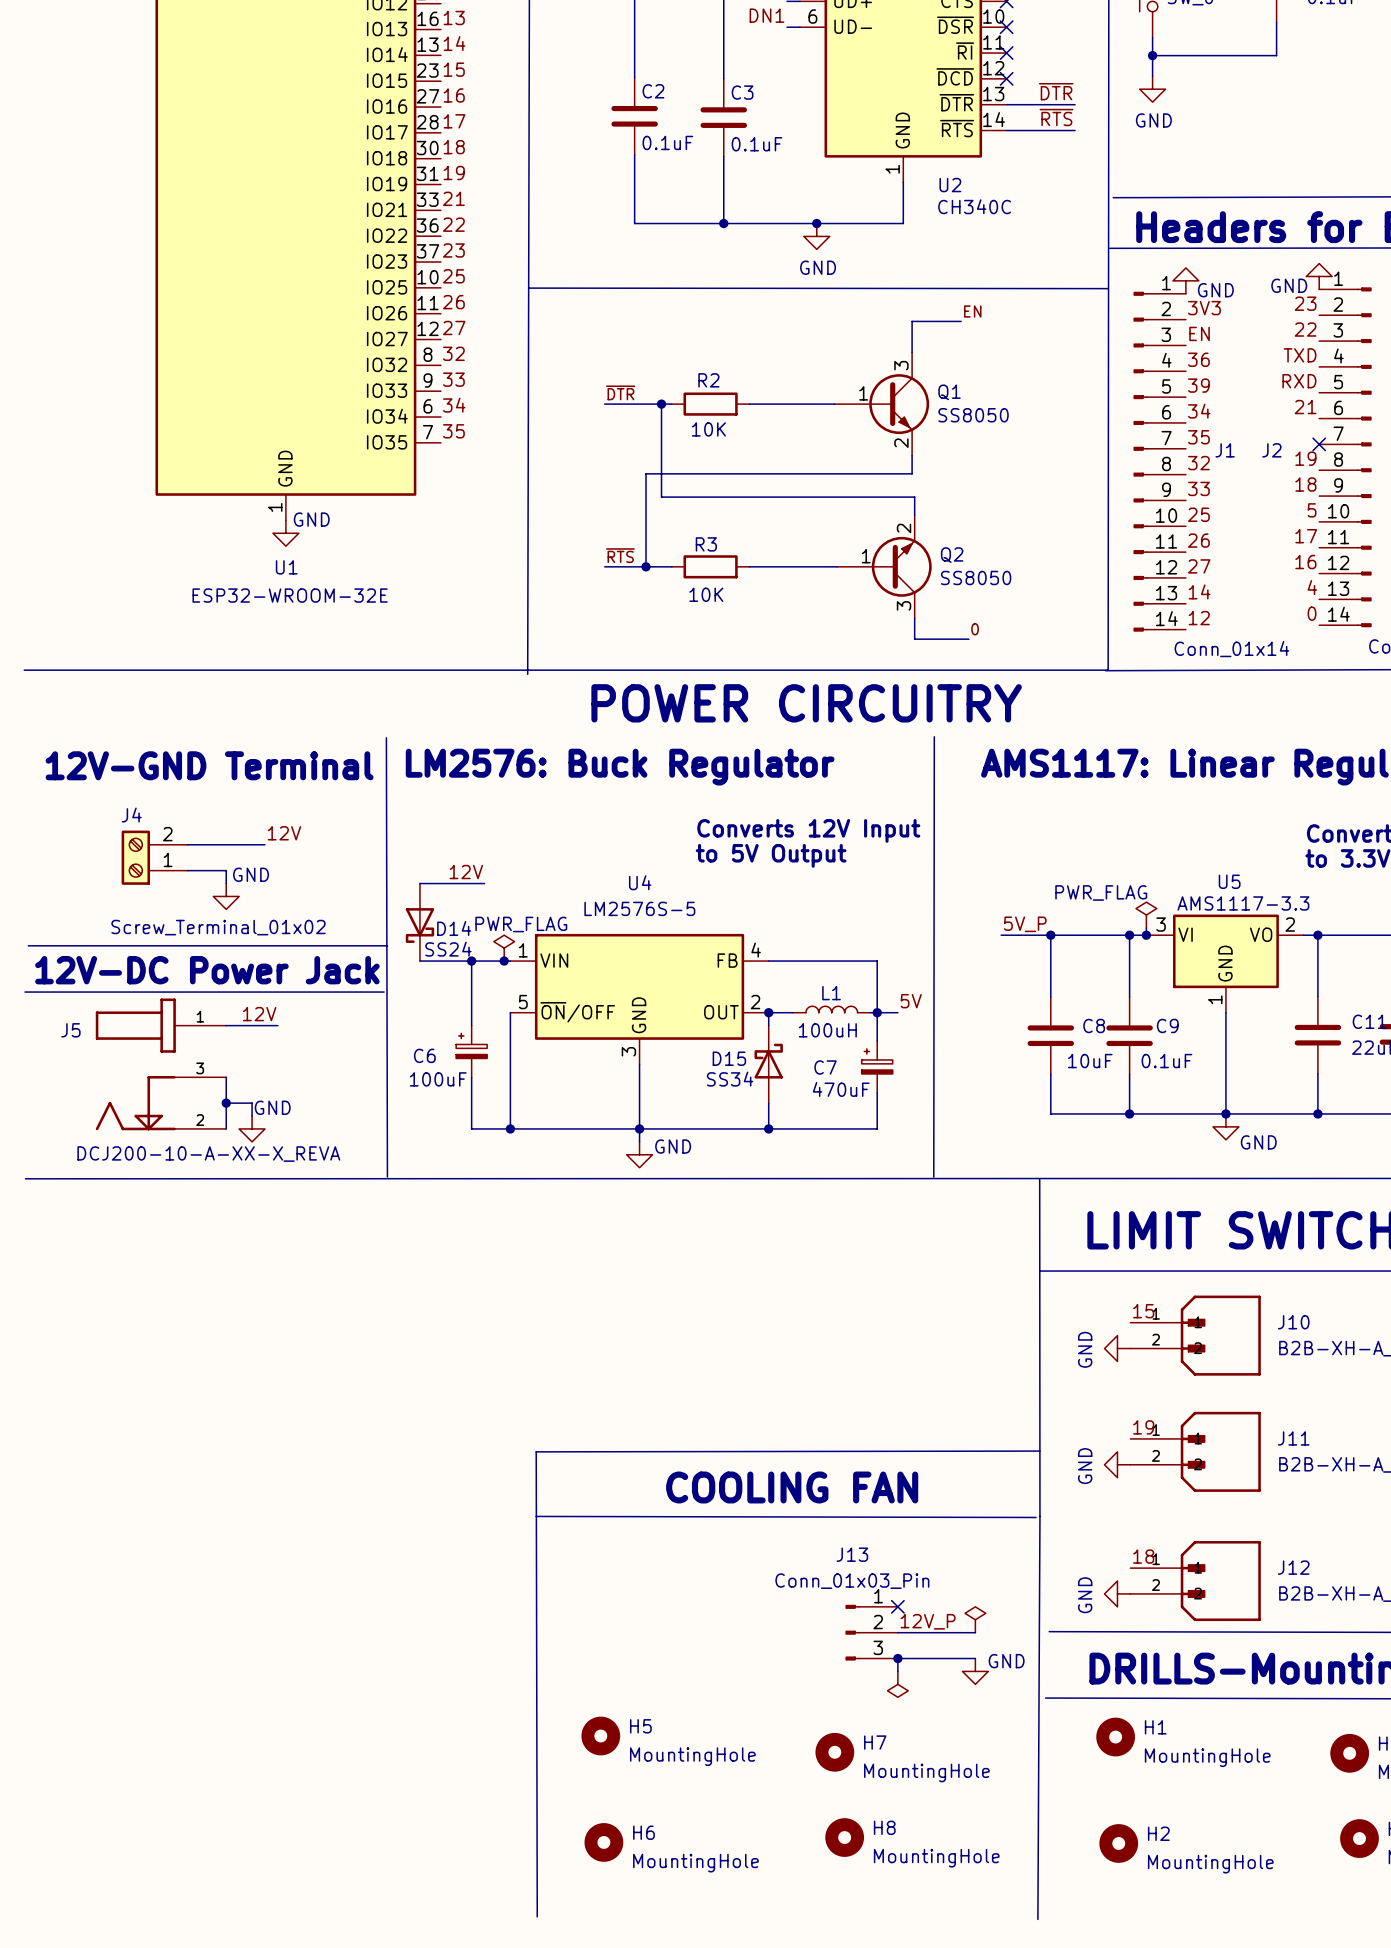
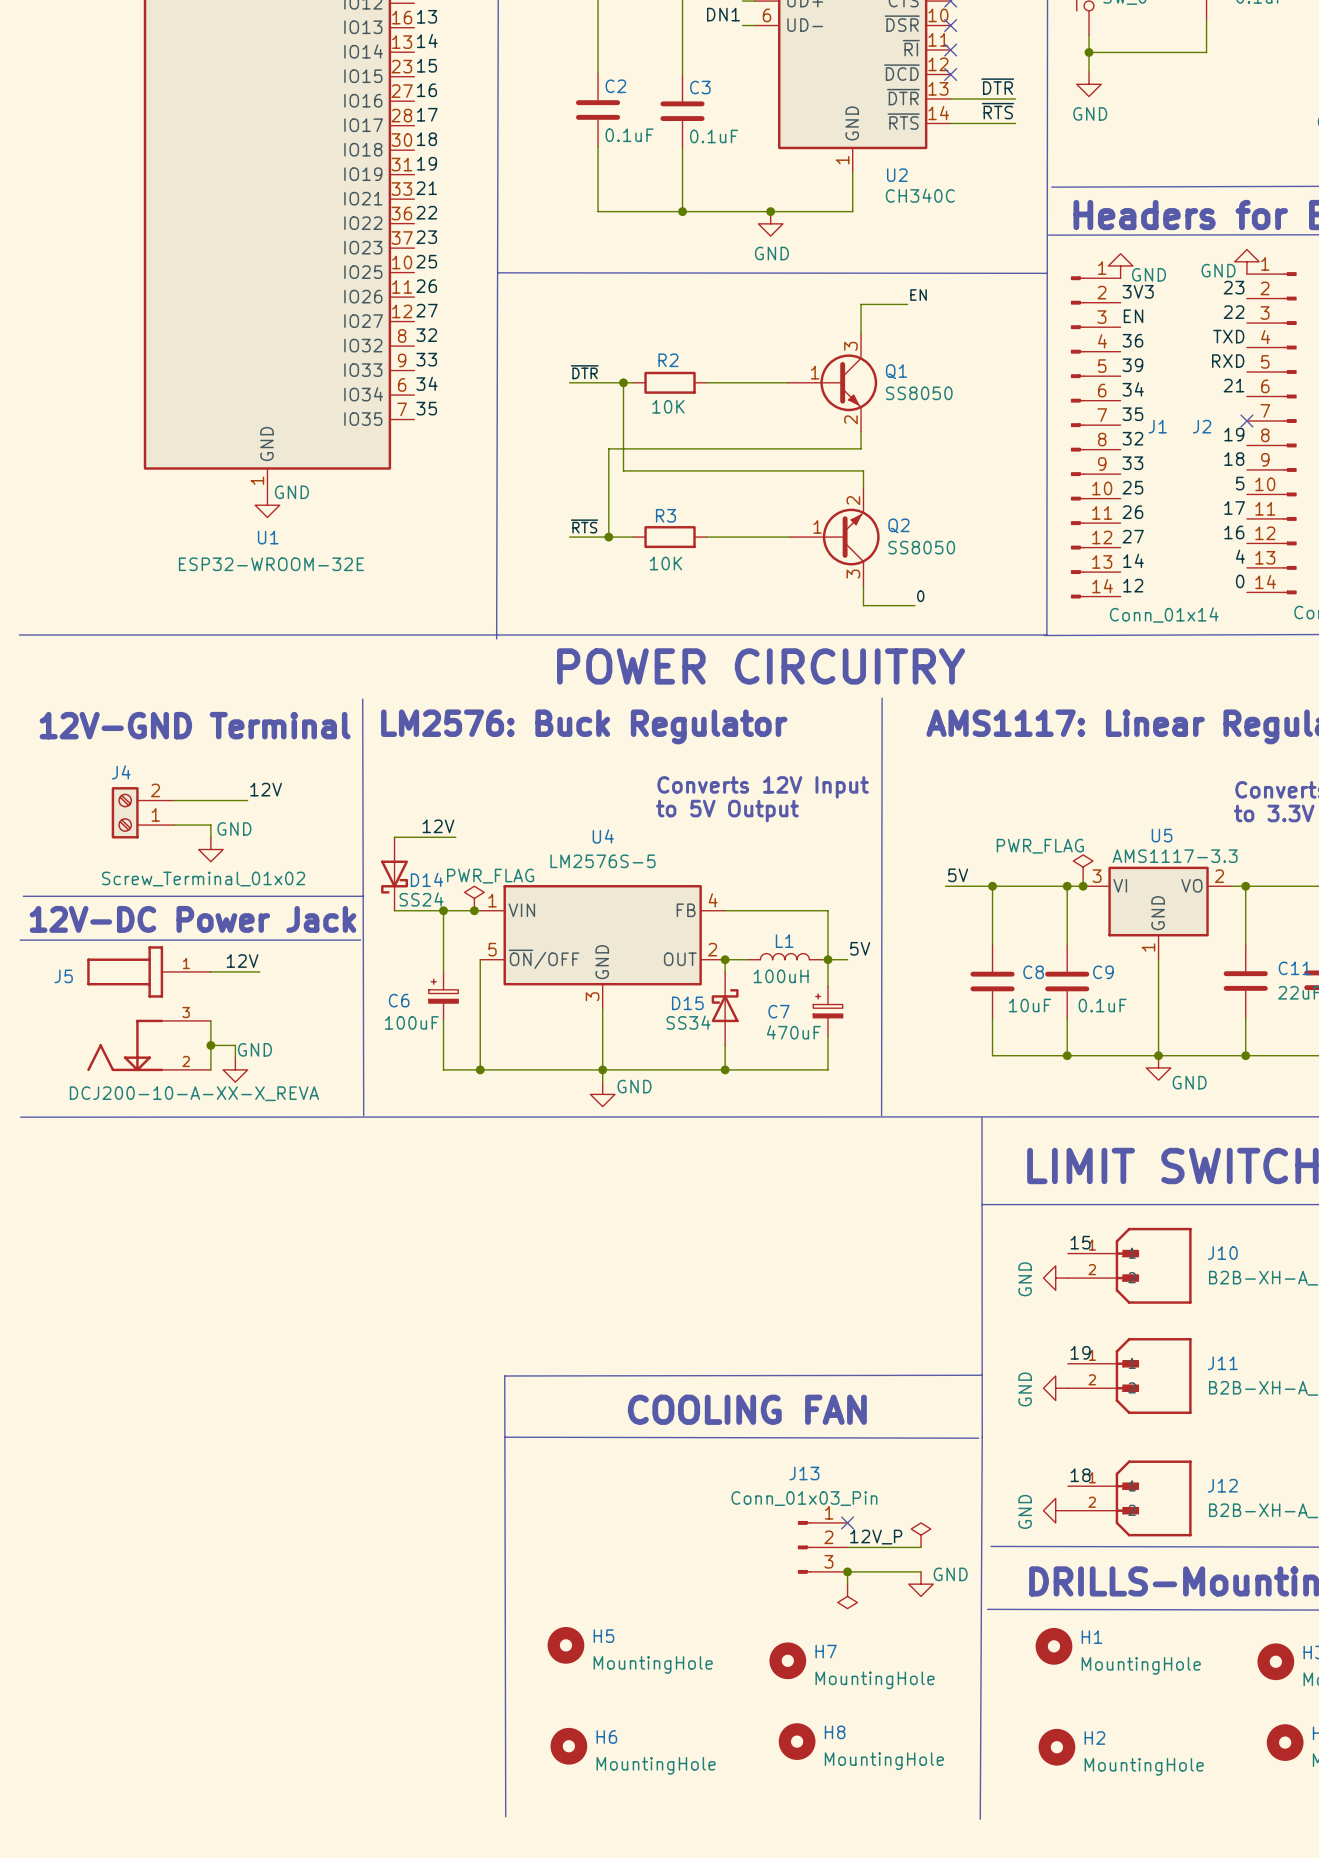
label: 5V_P (1025, 924) -> 5V (958, 875)

